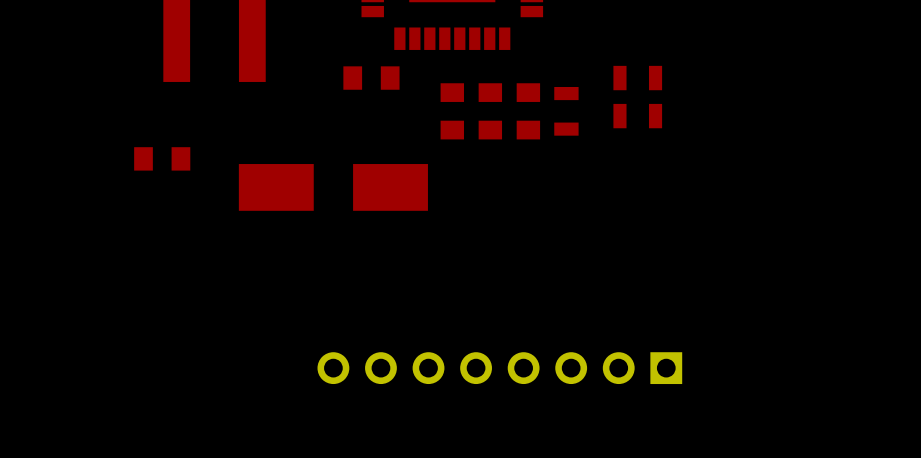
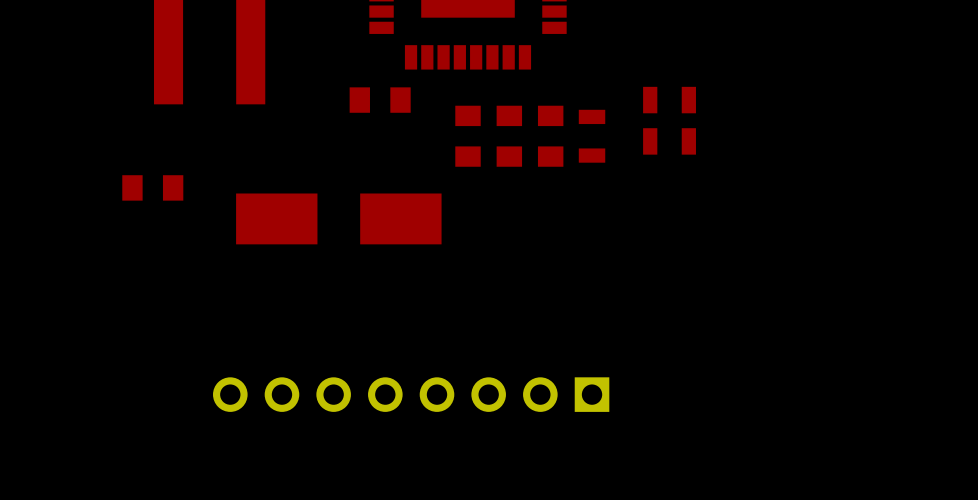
part position: (499, 368) -> (411, 394)

